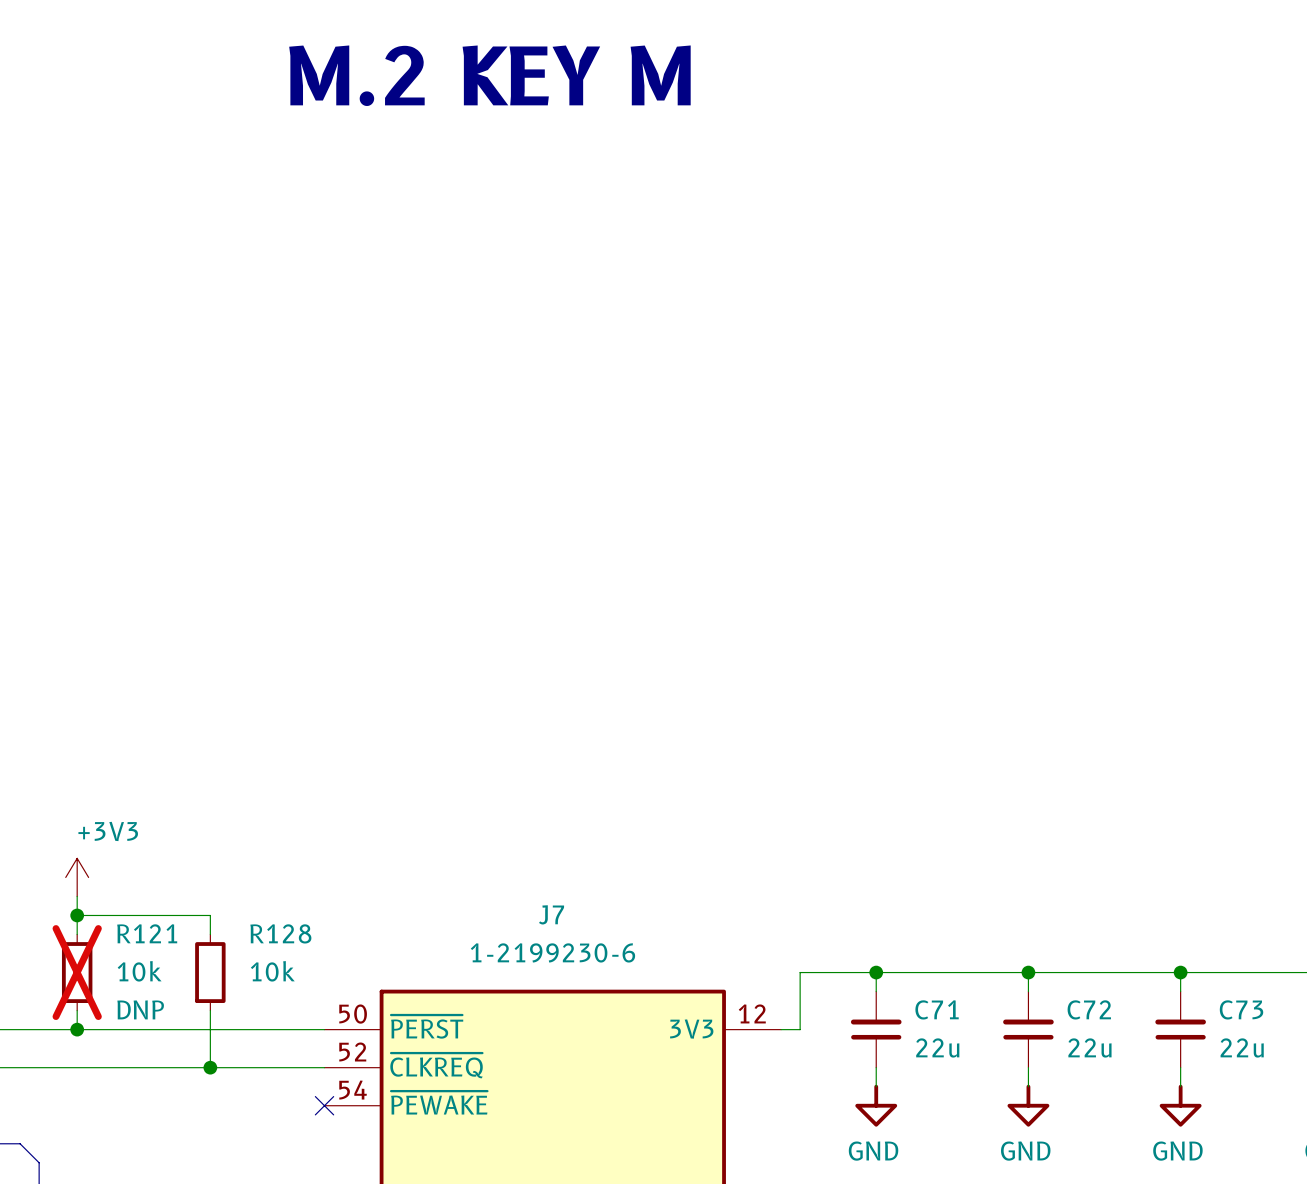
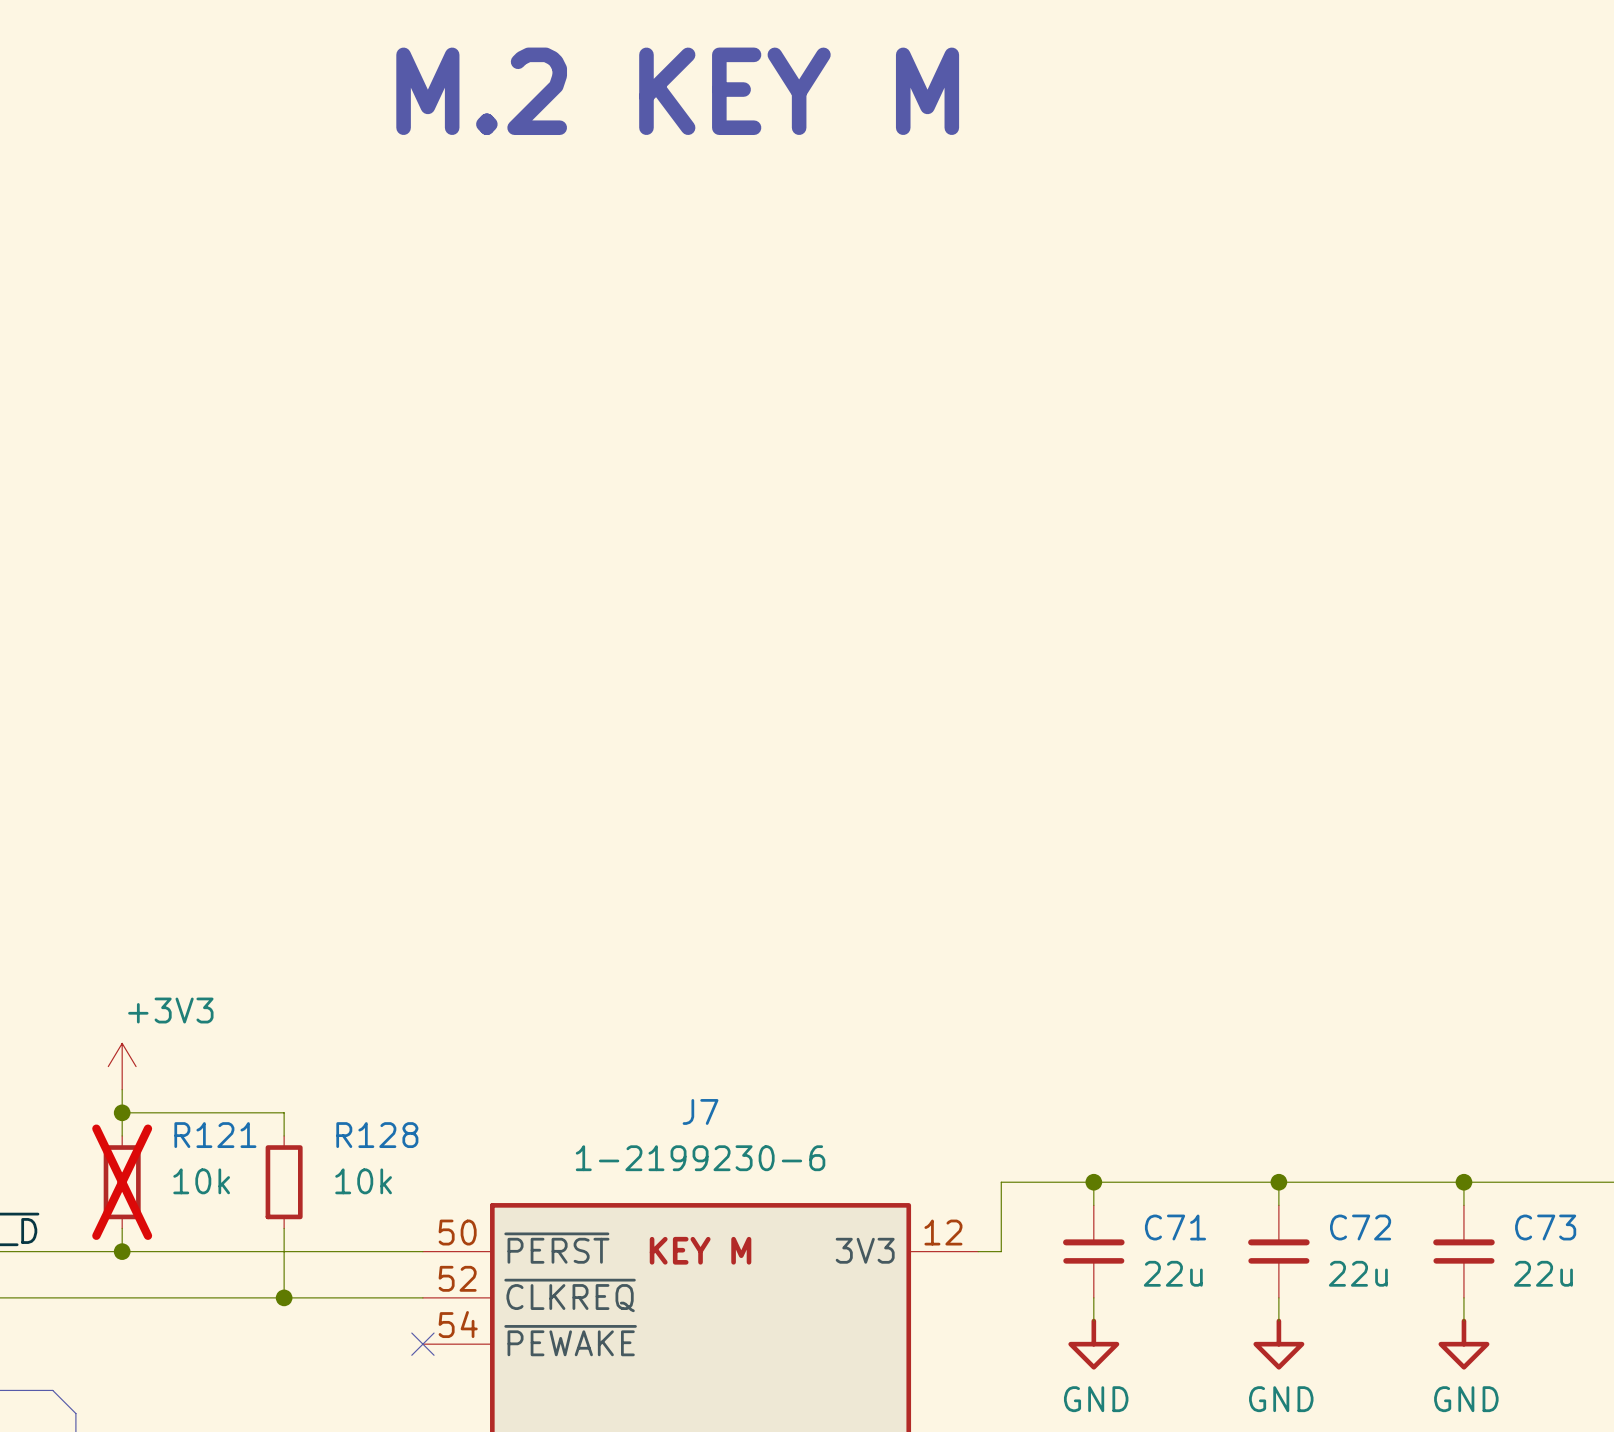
R121 text: DNP (140, 1009) -> none
J7 text: none -> KEY M (700, 1250)

